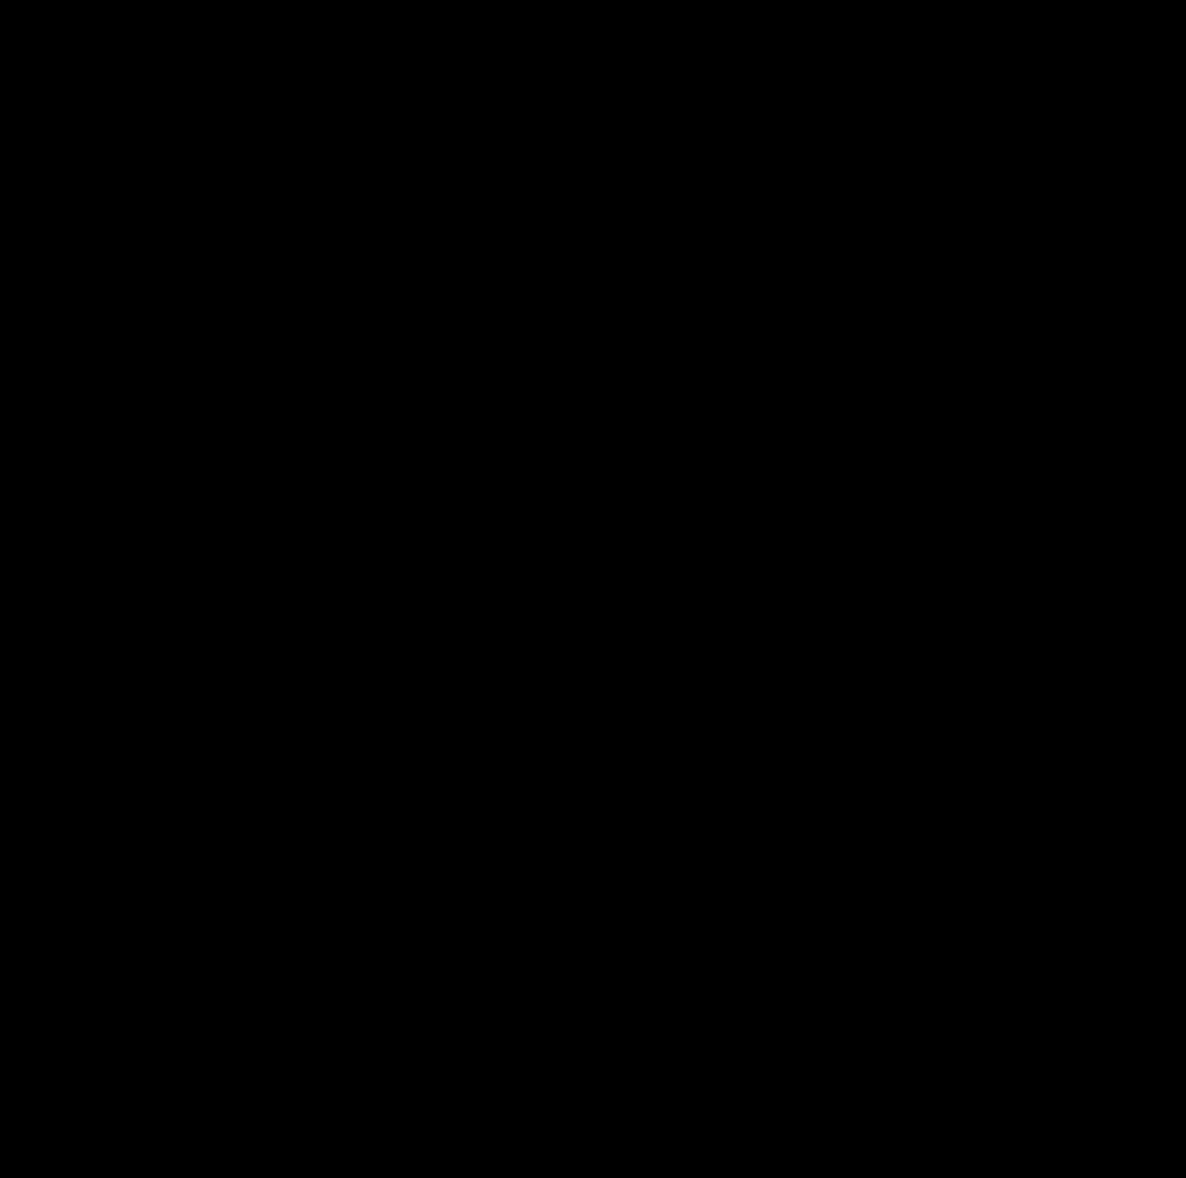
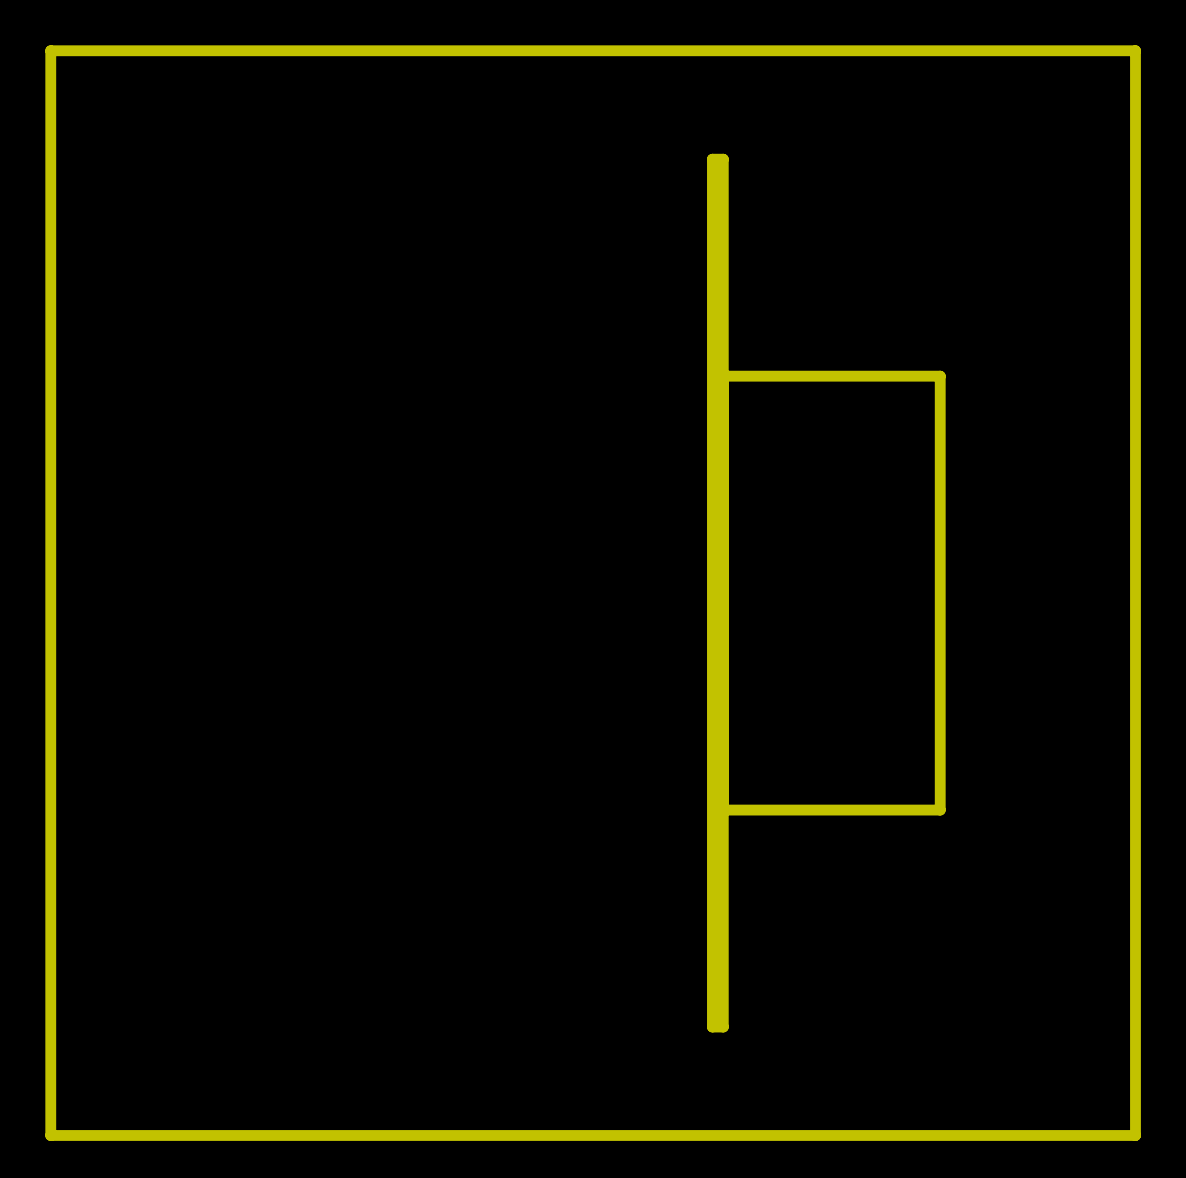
board edge: none -> (1135, 50) (50, 50) (50, 1135) (1135, 1135) (1135, 50)
board edge: none -> (723, 159) (723, 1027) (712, 1027) (712, 159) (723, 159)
board edge: none -> (723, 376) (940, 376) (940, 810) (723, 810)

